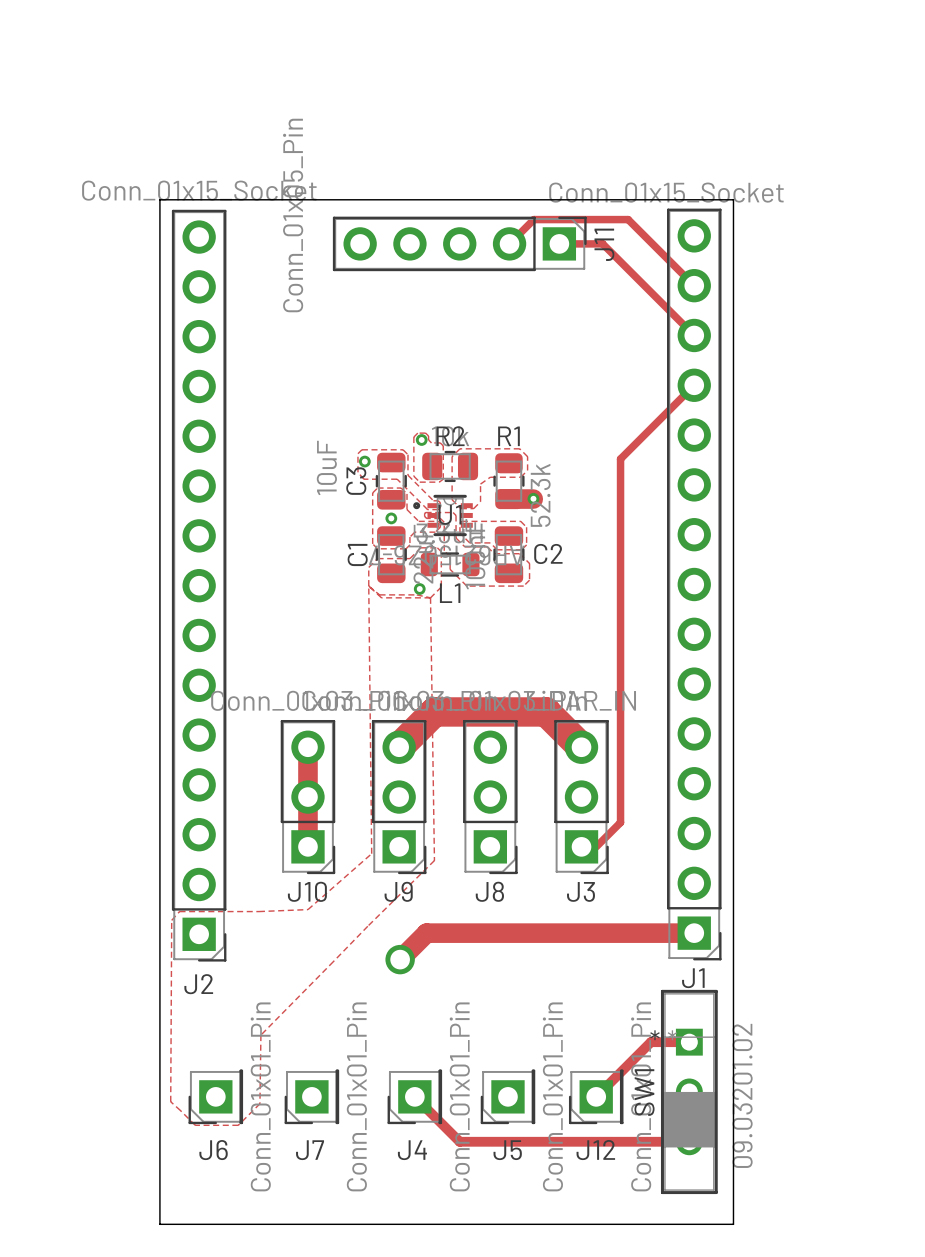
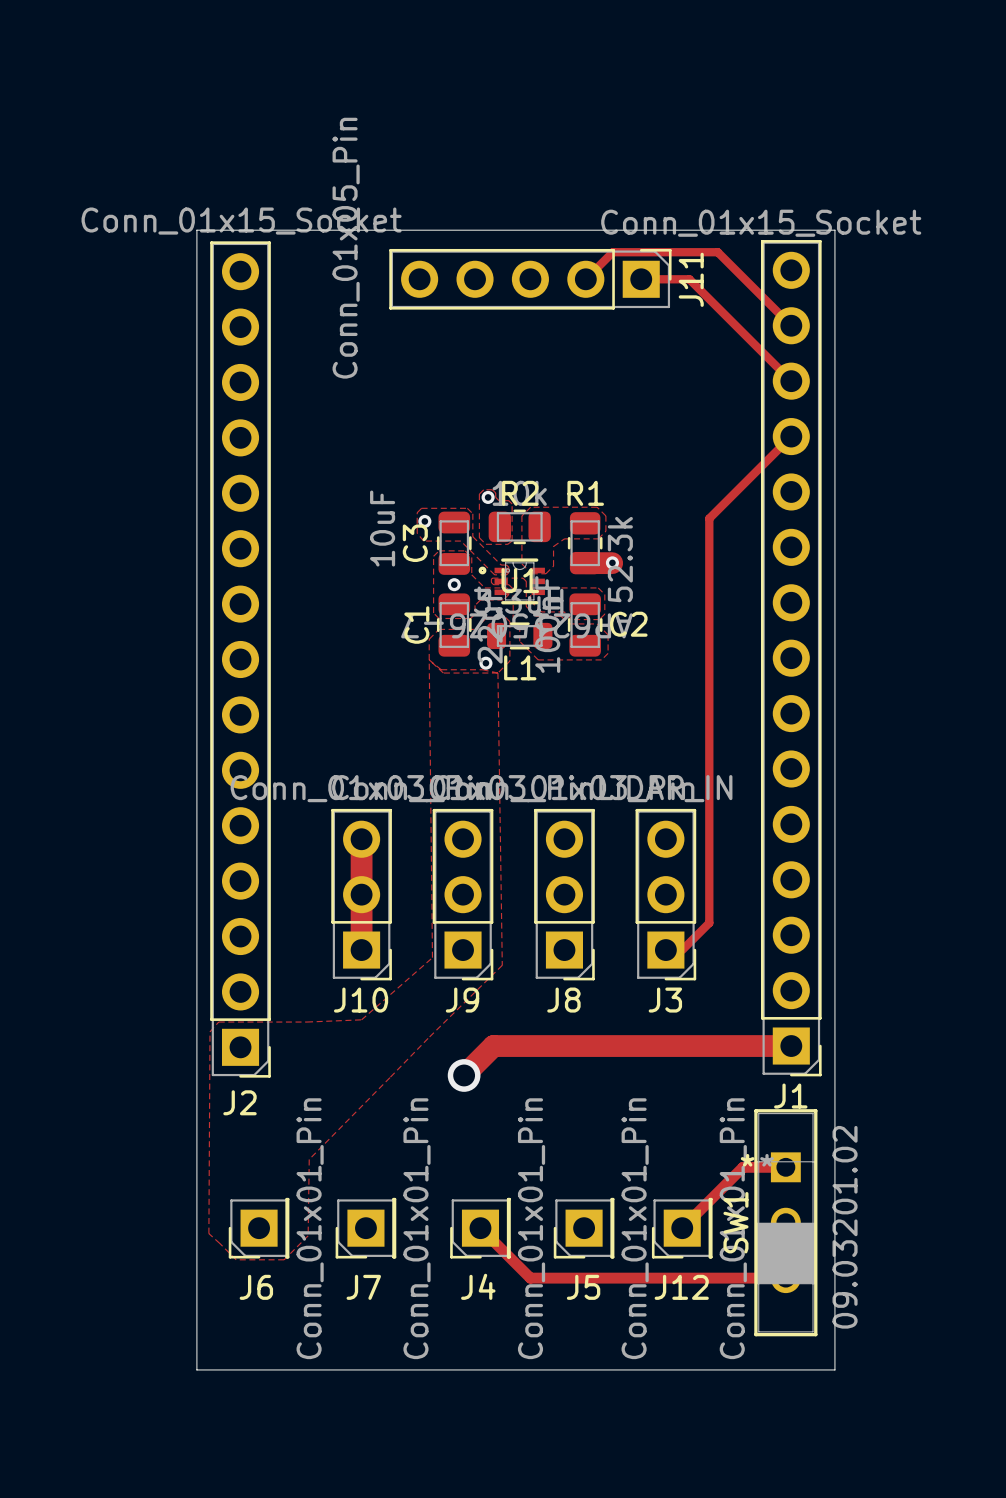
track: (399, 747) (434, 711) (546, 711) (581, 747) -> none

